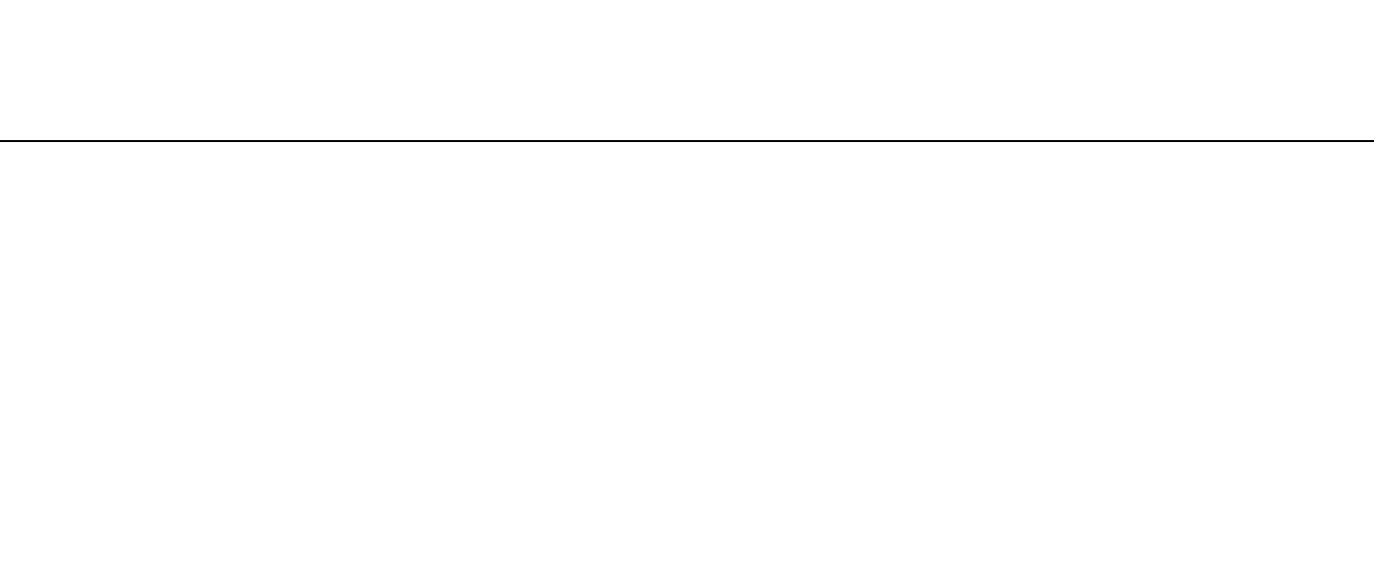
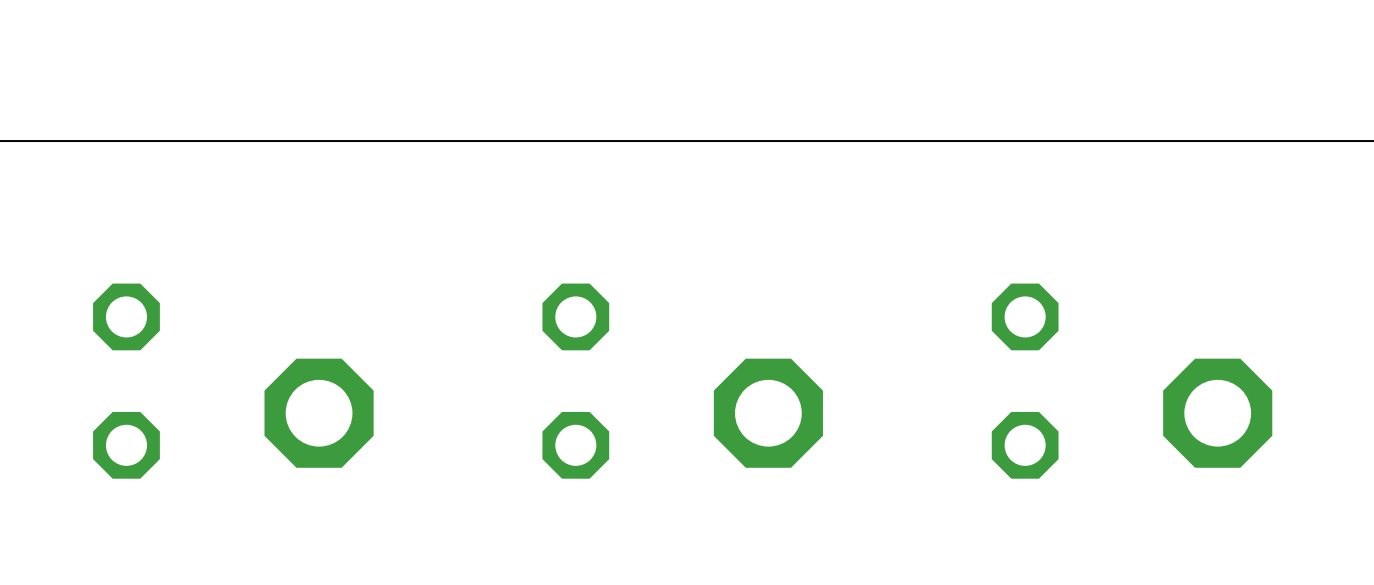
part: none -> (126, 381)
part: none -> (575, 381)
part: none -> (1025, 381)
part: none -> (319, 413)
part: none -> (768, 413)
part: none -> (1217, 413)

